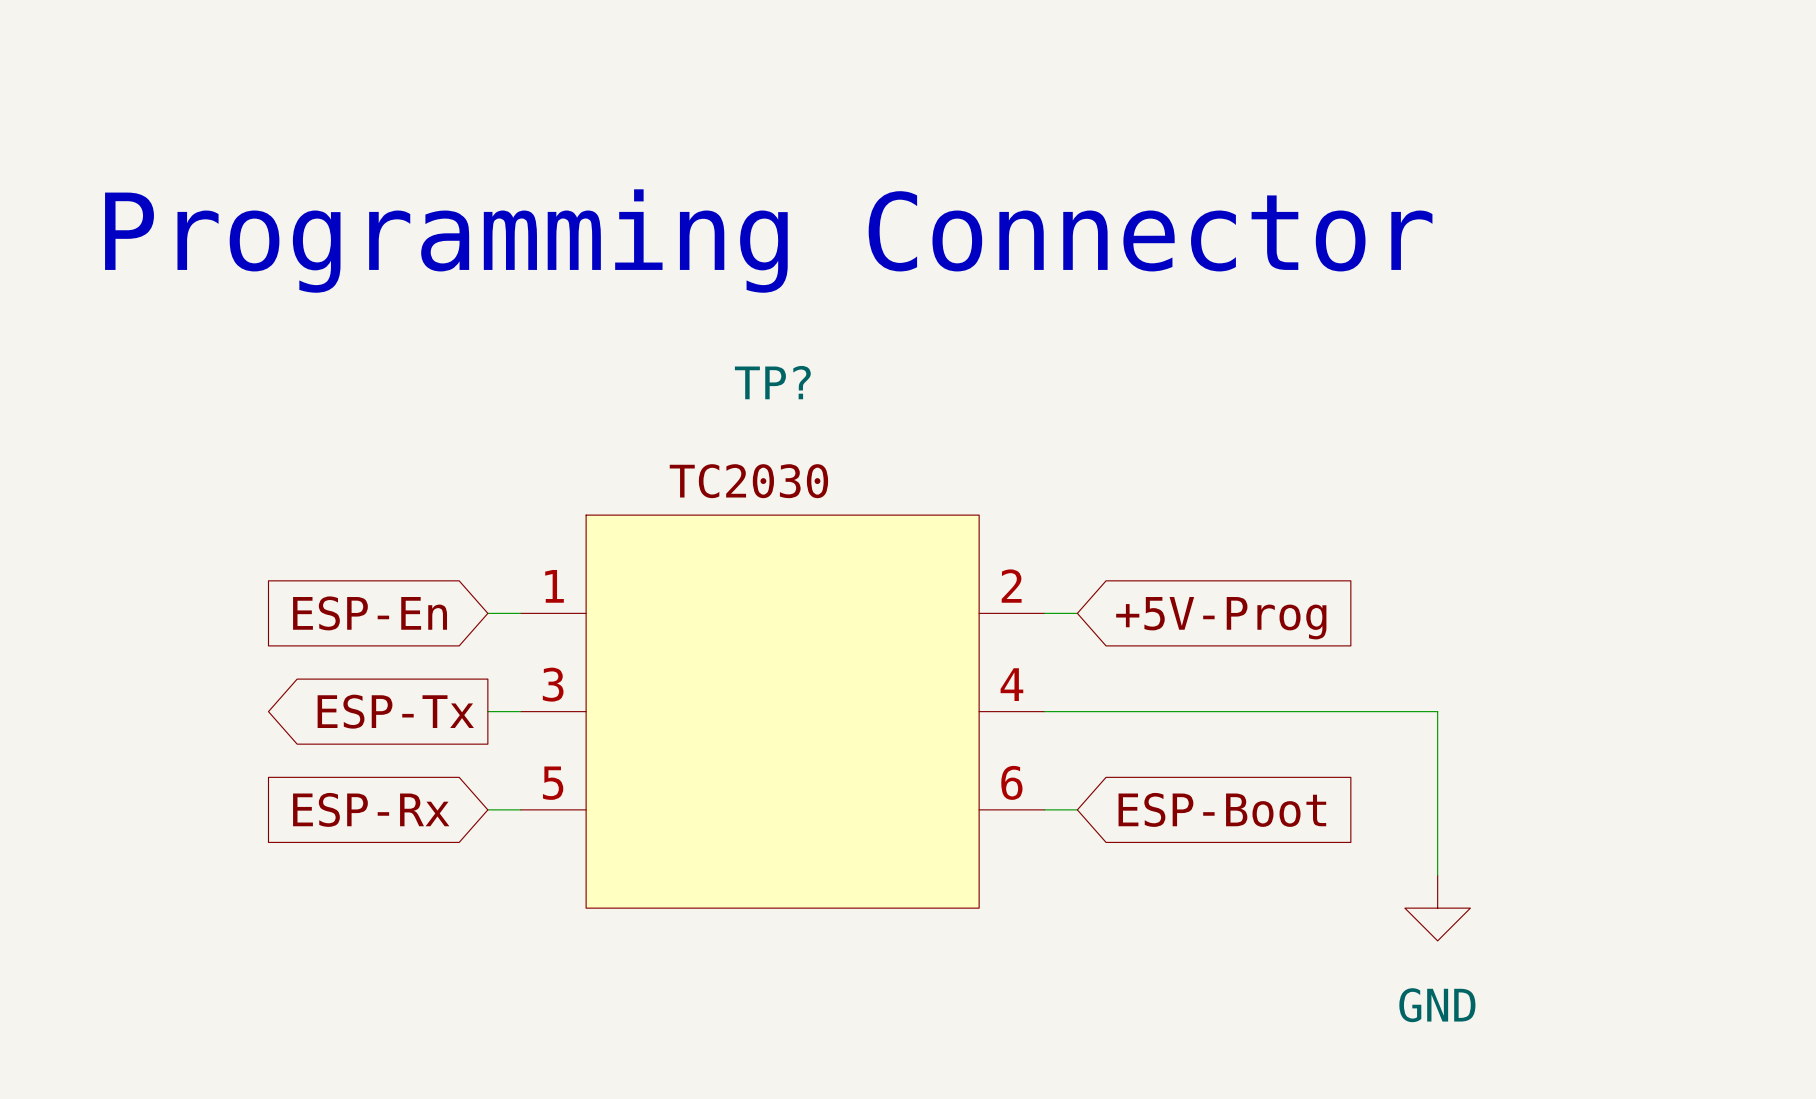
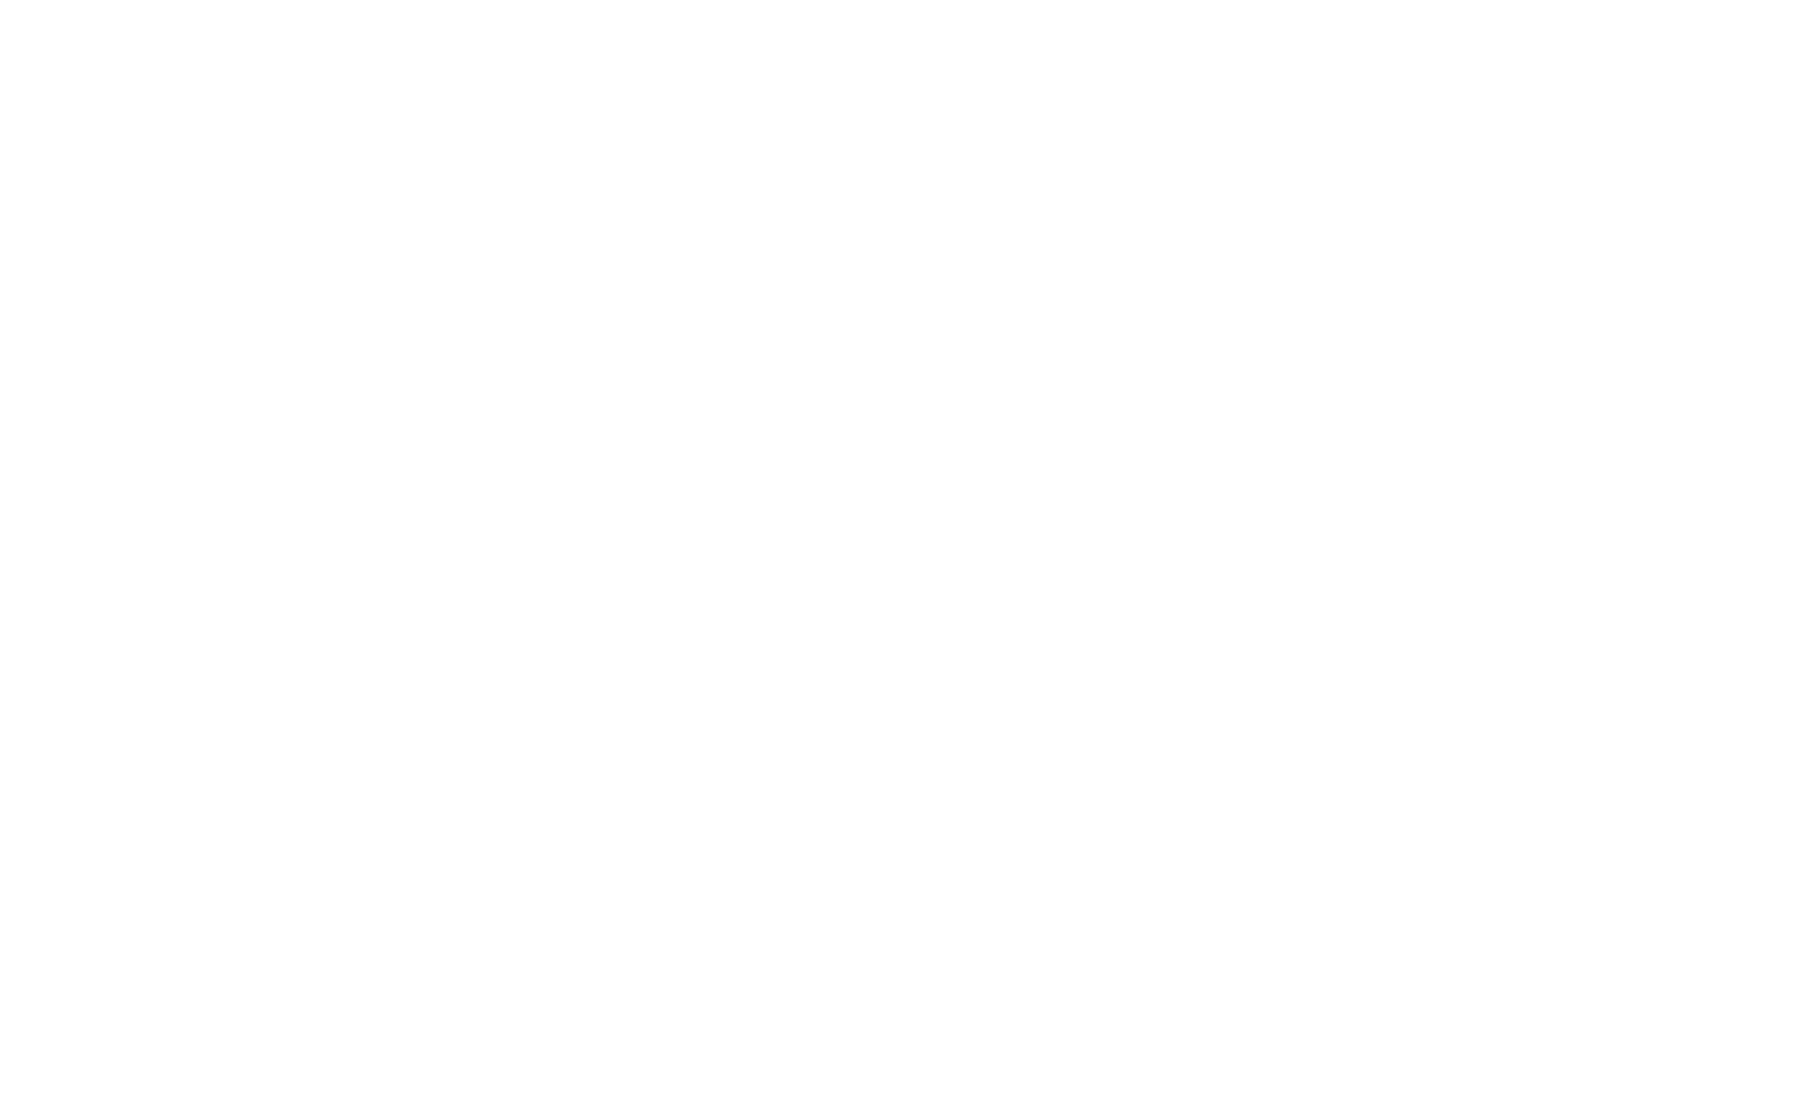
text: Programming Connector (768, 241) -> none
global label: ESP-En (370, 613) -> none
wire: (487, 613) (520, 613) -> none
wire: (1044, 613) (1077, 613) -> none
global label: +5V-Prog (1221, 618) -> none
global label: ESP-Tx (395, 711) -> none
wire: (487, 711) (520, 711) -> none
TP?: (782, 711) -> none
wire: (1044, 711) (1437, 711) (1437, 875) -> none
global label: ESP-Rx (371, 809) -> none
wire: (487, 809) (520, 809) -> none
wire: (1044, 809) (1077, 809) -> none
global label: ESP-Boot (1222, 809) -> none
power symbol: GND (1437, 908) -> none

